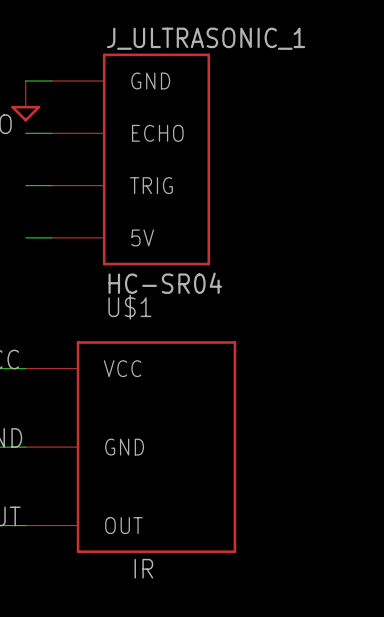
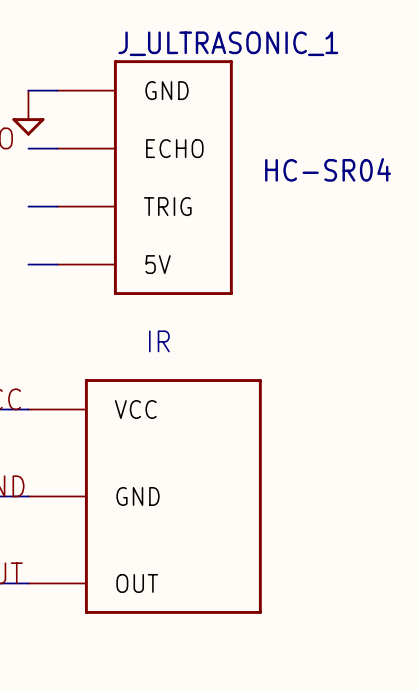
J_ULTRASONIC_1 value position: HC-SR04 (165, 283) -> HC-SR04 (328, 169)
U$1 name: U$1 (129, 307) -> none
U$1 value position: IR (143, 568) -> IR (159, 341)

